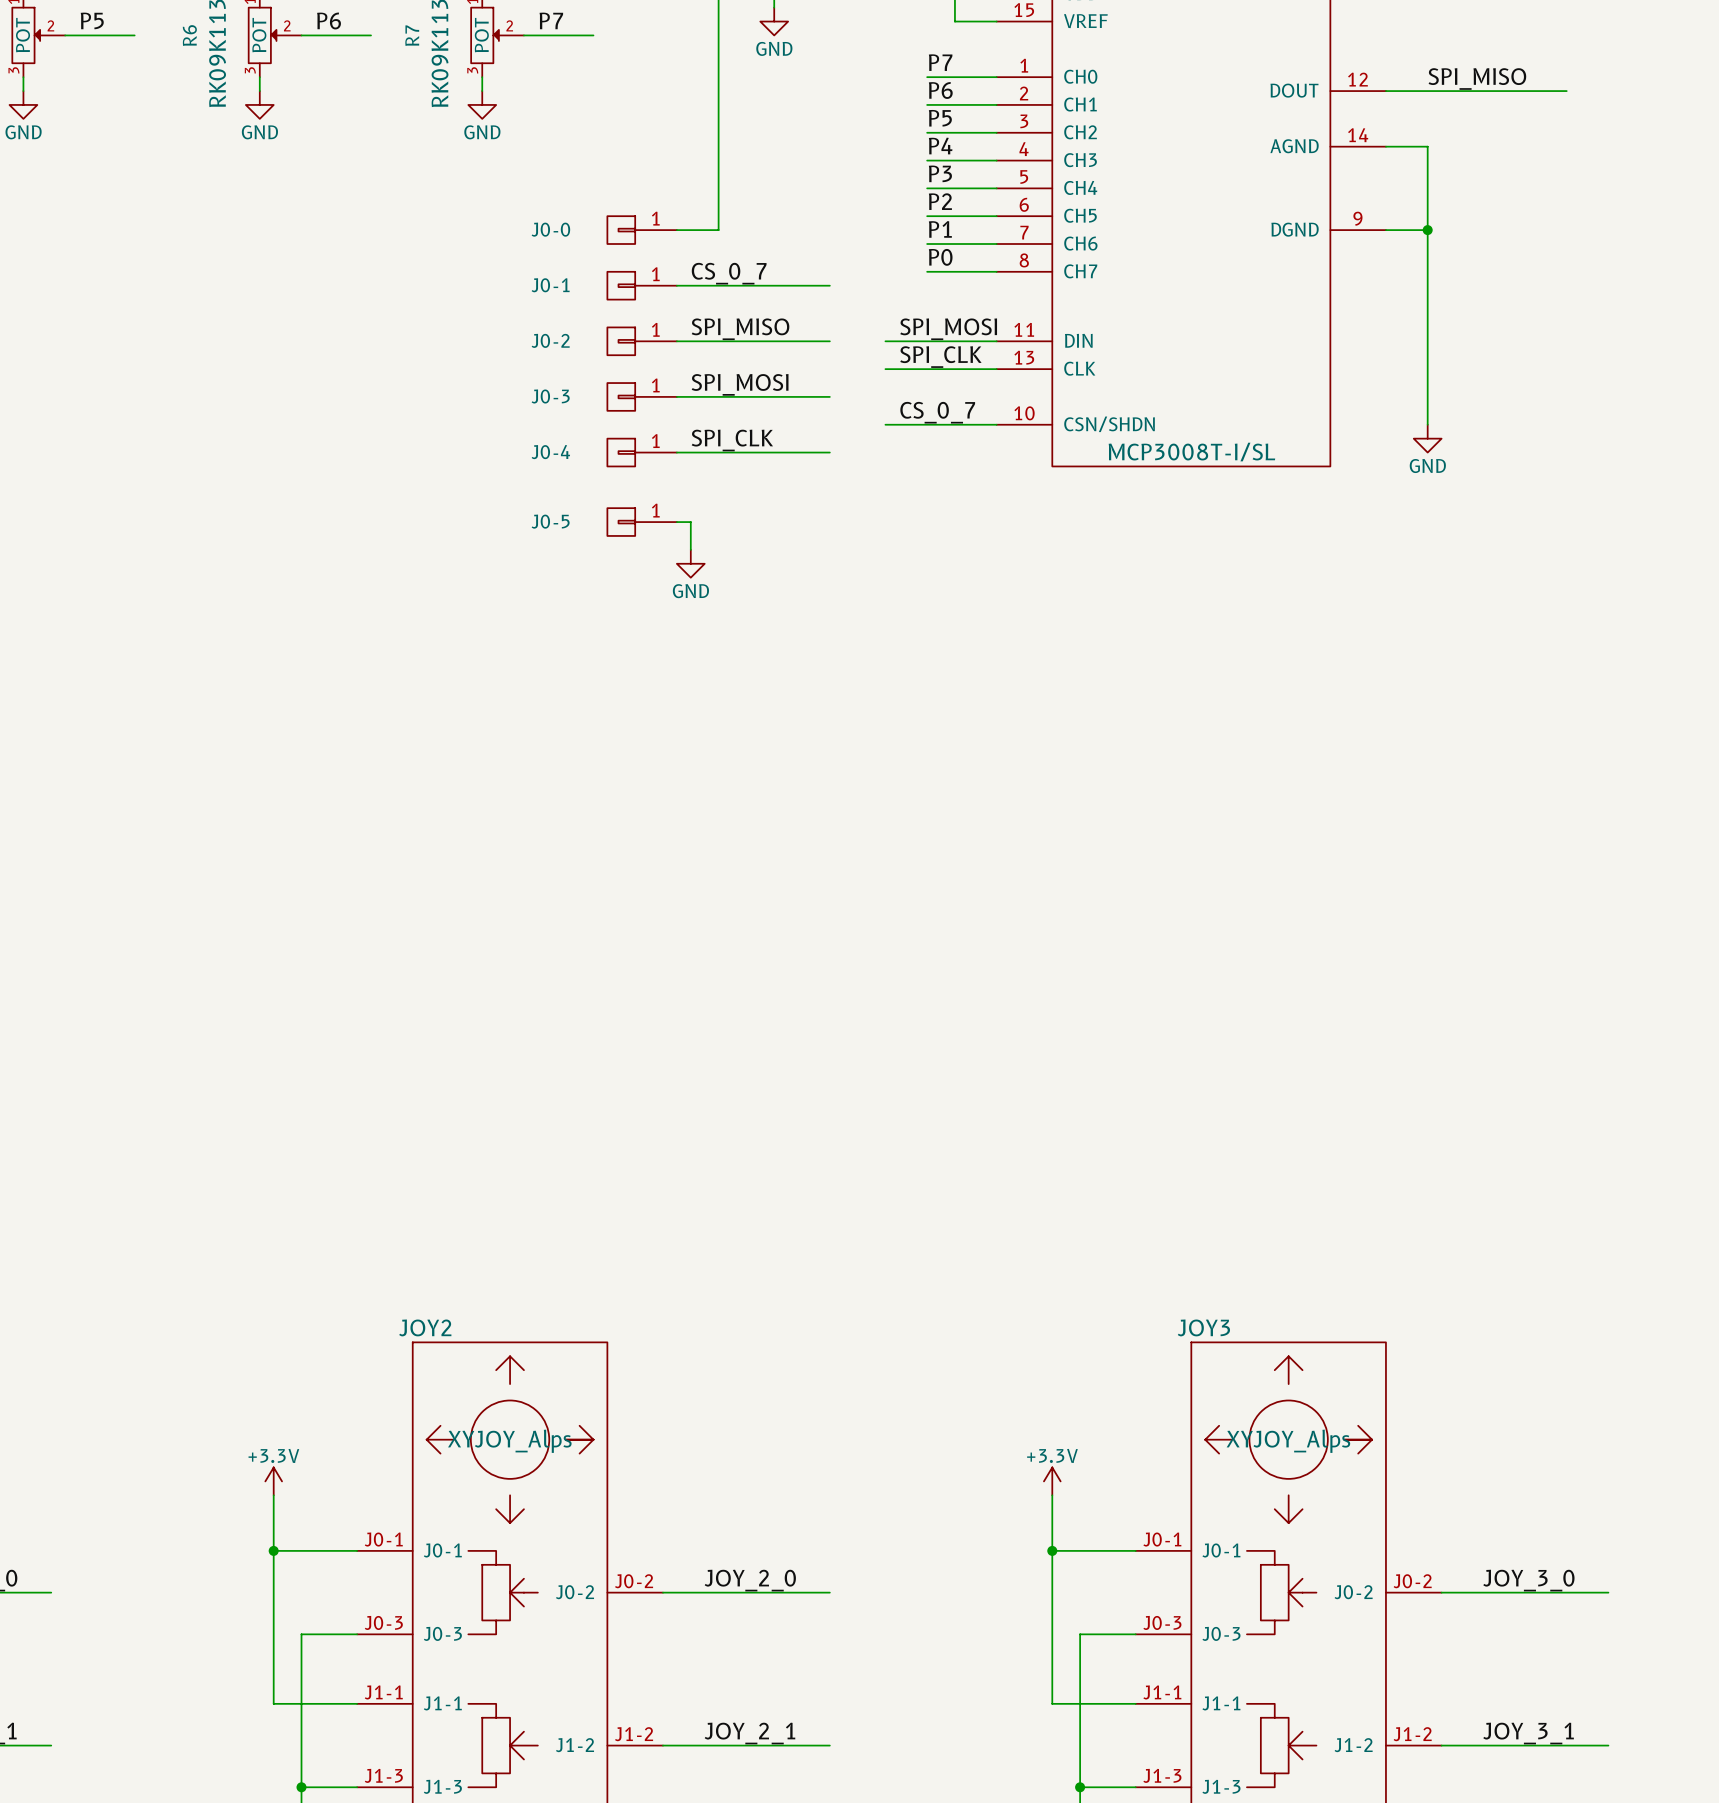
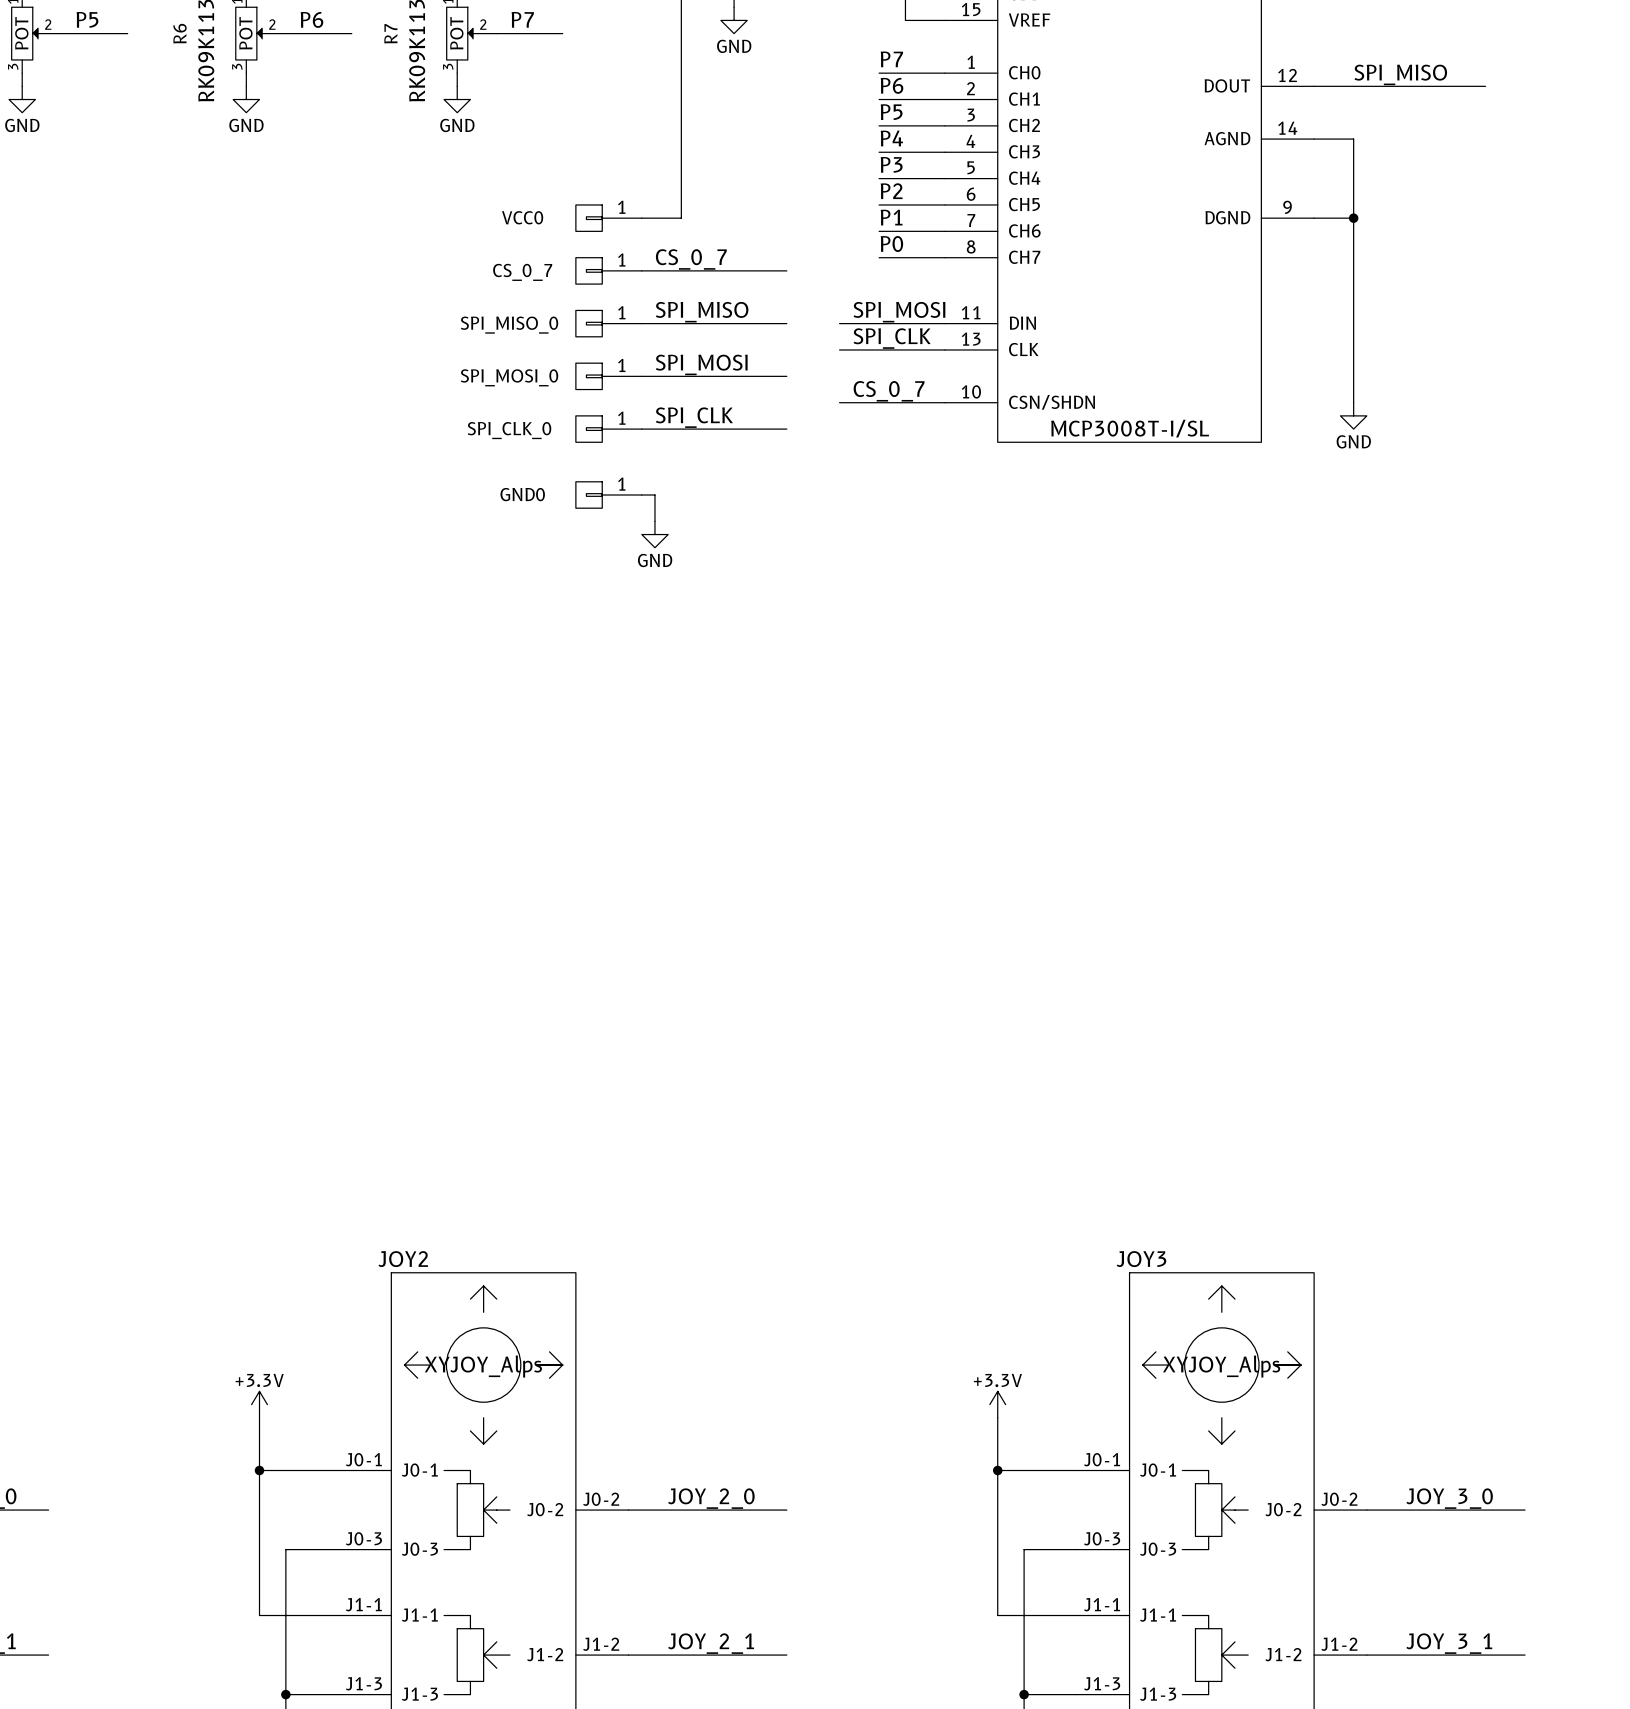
J0-0 name: J0-0 (550, 229) -> VCC0 (522, 217)
J0-1 name: J0-1 (550, 285) -> CS_0_7 (522, 272)
J0-2 name: J0-2 (550, 340) -> SPI_MISO_0 (509, 325)
J0-3 name: J0-3 (550, 396) -> SPI_MOSI_0 (509, 377)
J0-4 name: J0-4 (550, 452) -> SPI_CLK_0 (509, 430)
J0-5 name: J0-5 (550, 521) -> GND0 (522, 494)

